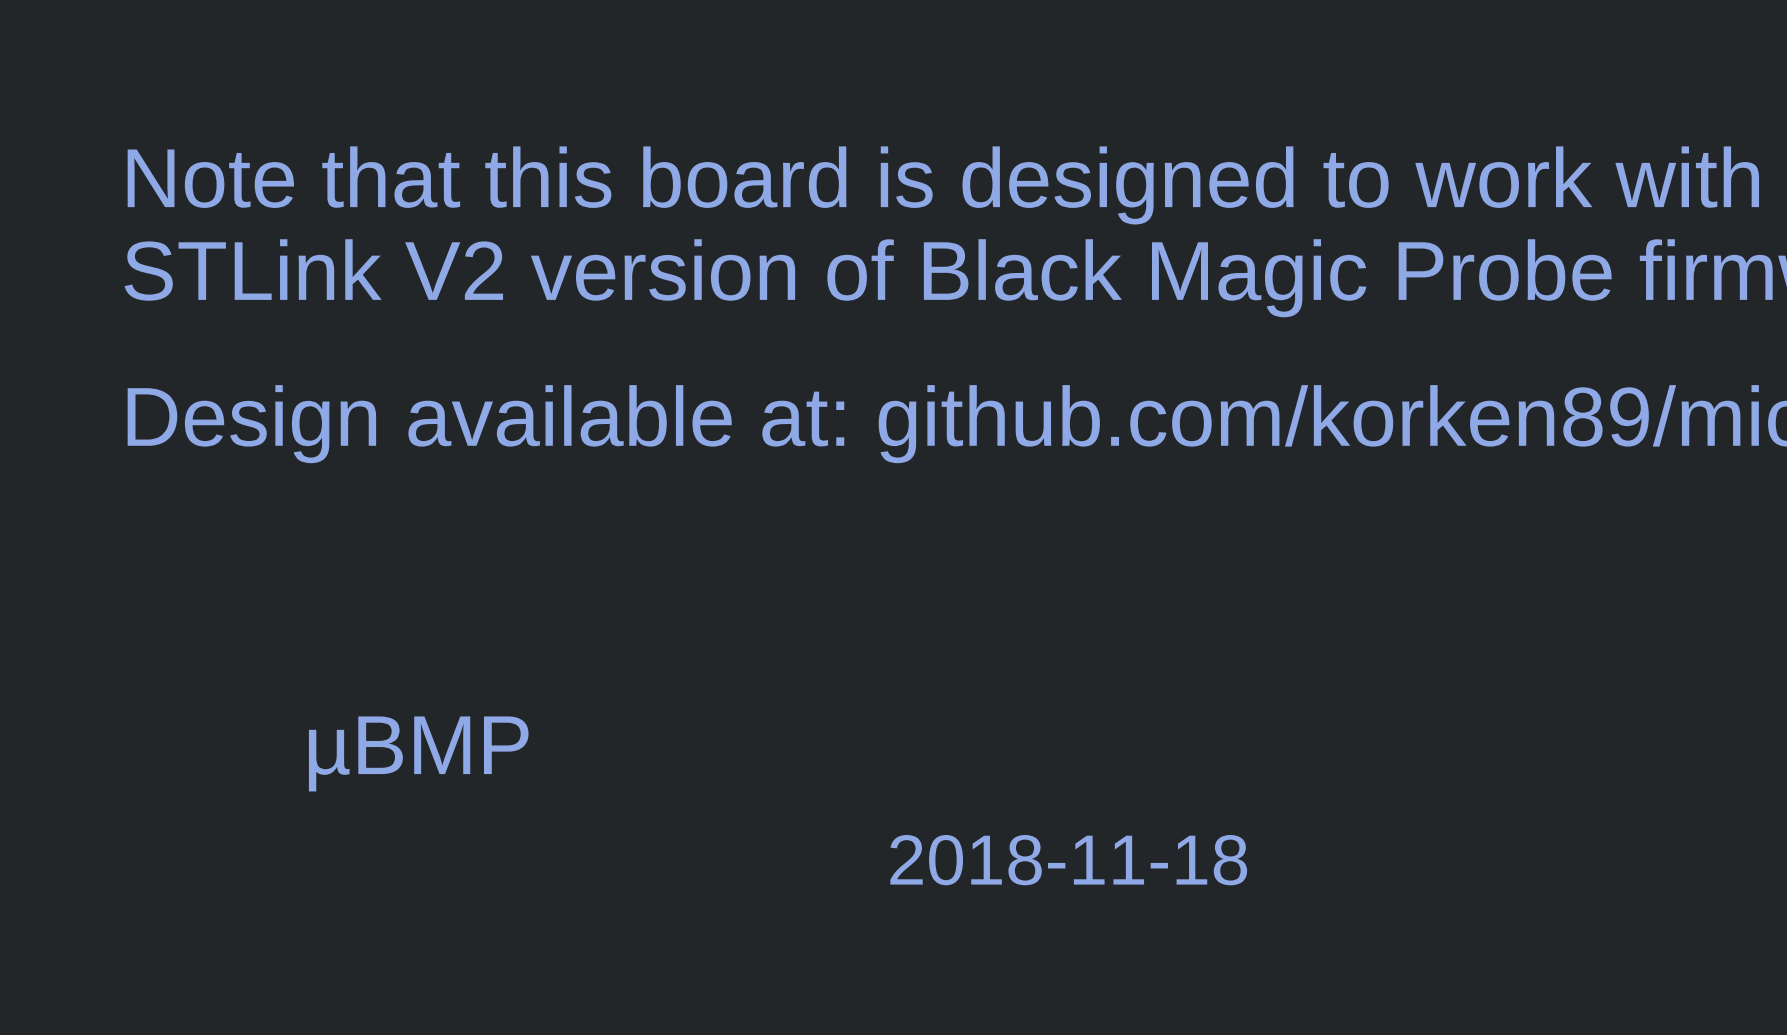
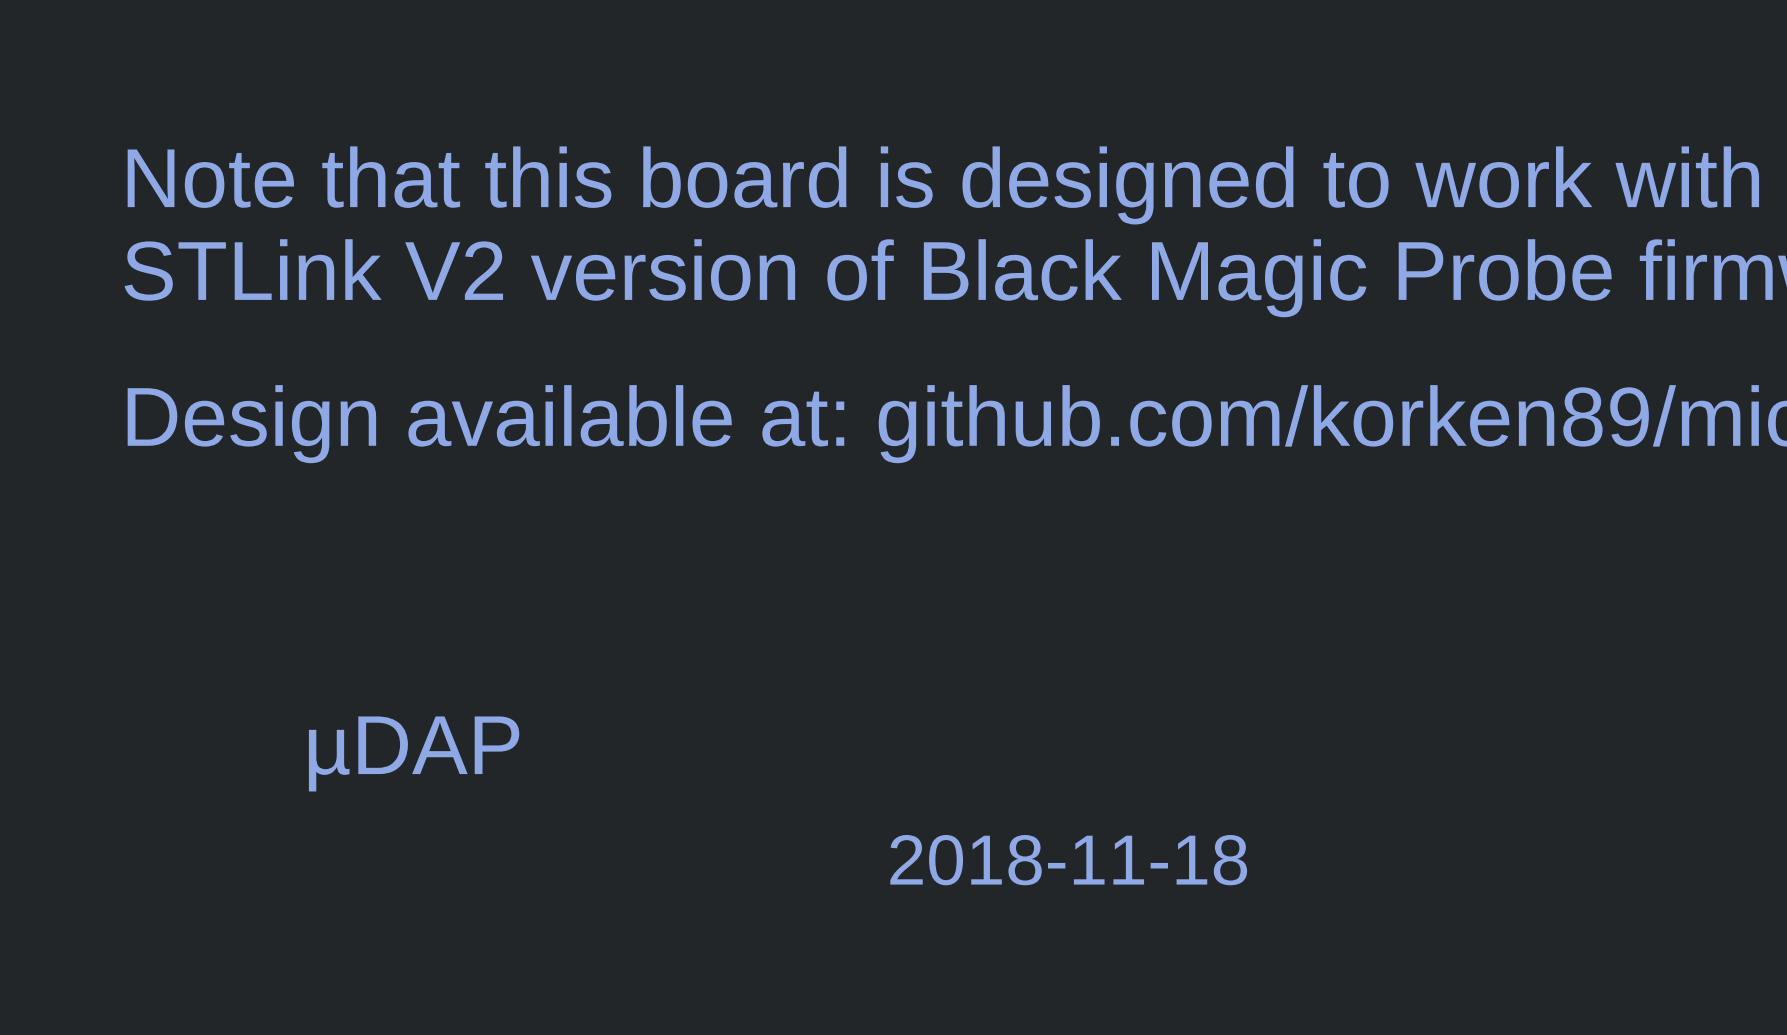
text: µBMP (418, 753) -> µDAP (414, 753)

